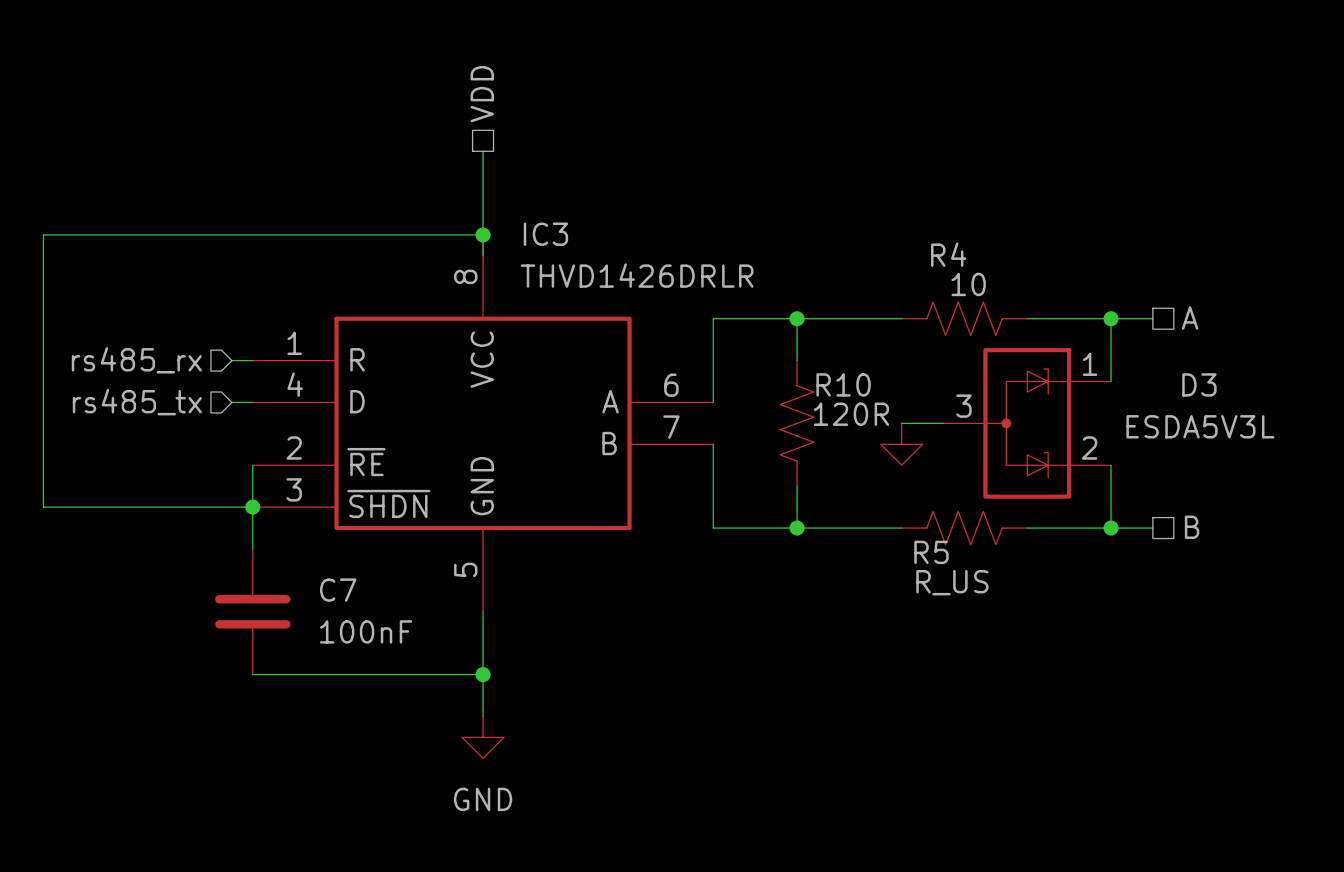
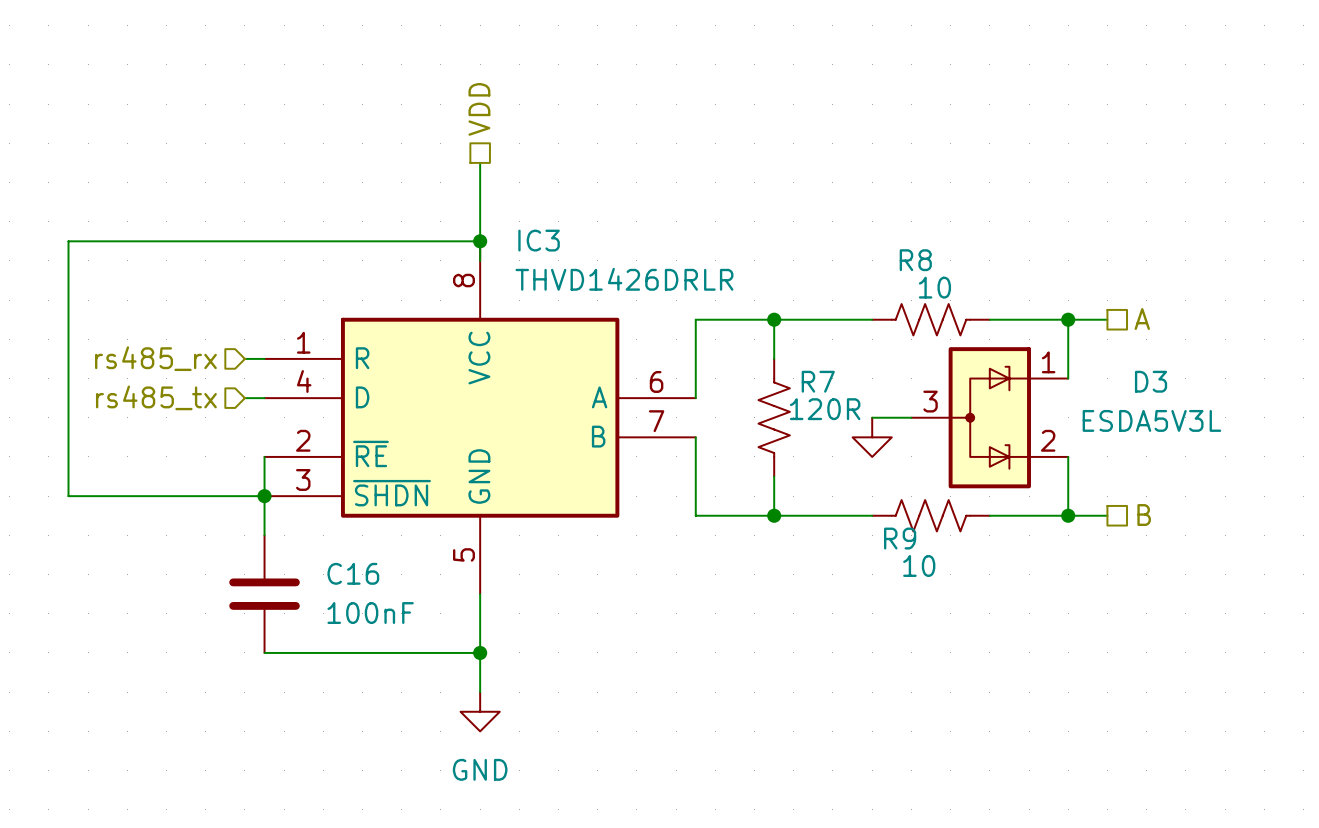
R4 name: R4 (948, 254) -> R8 (915, 260)
R10 name: R10 (843, 384) -> R7 (818, 381)
R5 name: R5 (931, 552) -> R9 (900, 538)
R5 value: R_US (952, 582) -> 10 (919, 565)
C7 name: C7 (338, 590) -> C16 (353, 573)

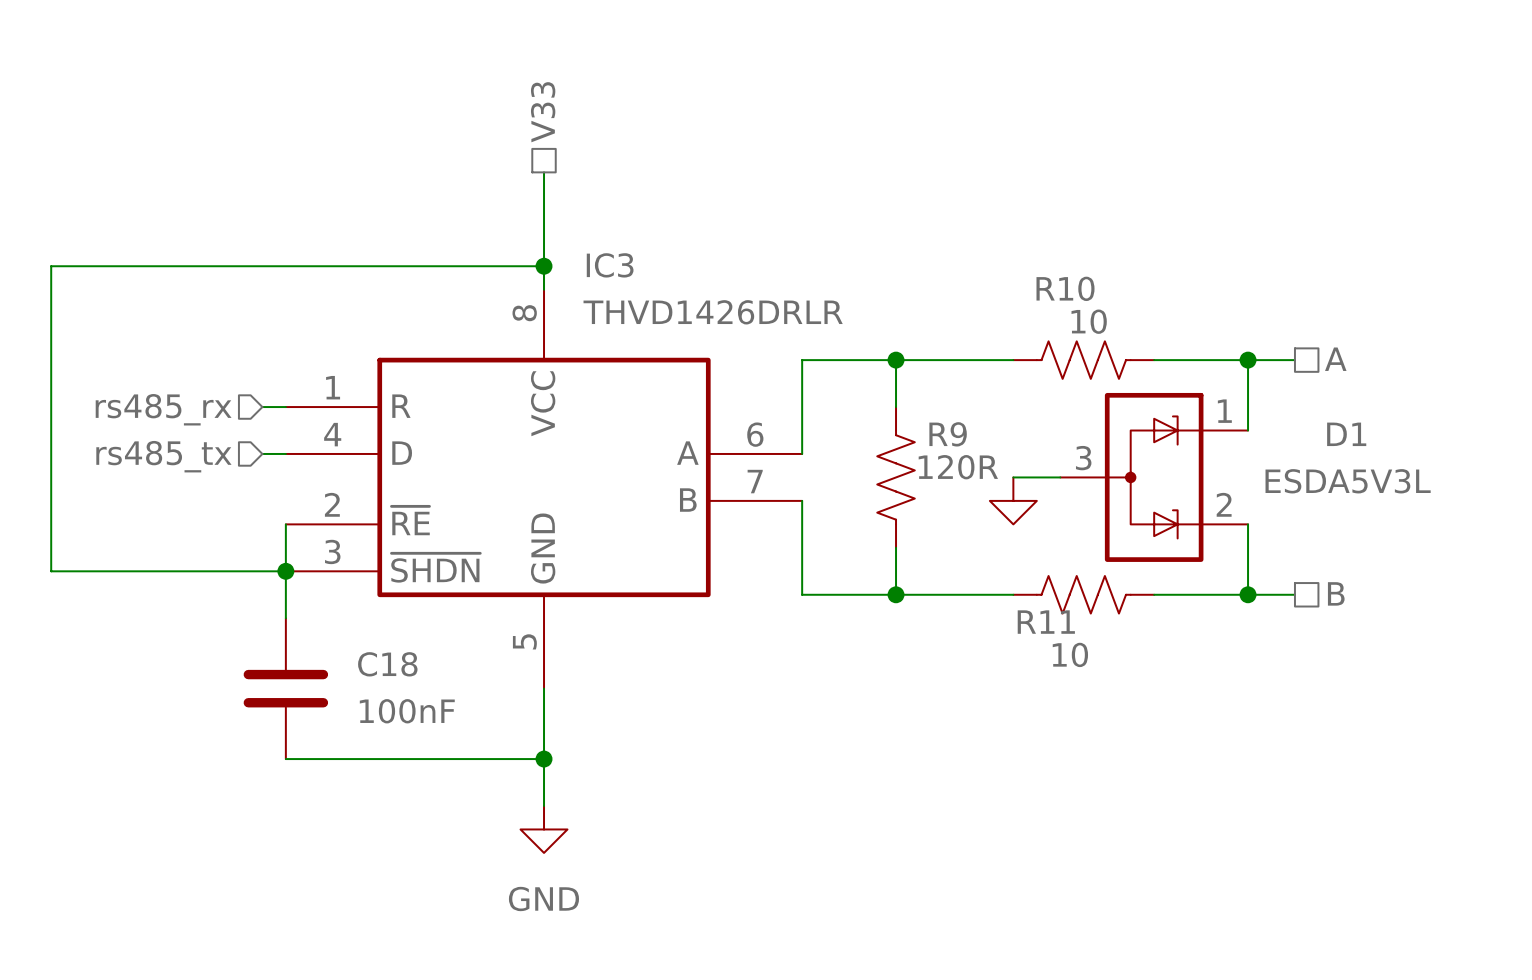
hierarchical label: VDD (479, 109) -> V33 (543, 112)
R8 name: R8 (915, 260) -> R10 (1065, 288)
R7 name: R7 (818, 381) -> R9 (948, 434)
D3 name: D3 (1151, 381) -> D1 (1346, 434)
R9 name: R9 (900, 538) -> R11 (1046, 622)
C16 name: C16 (353, 573) -> C18 (387, 664)

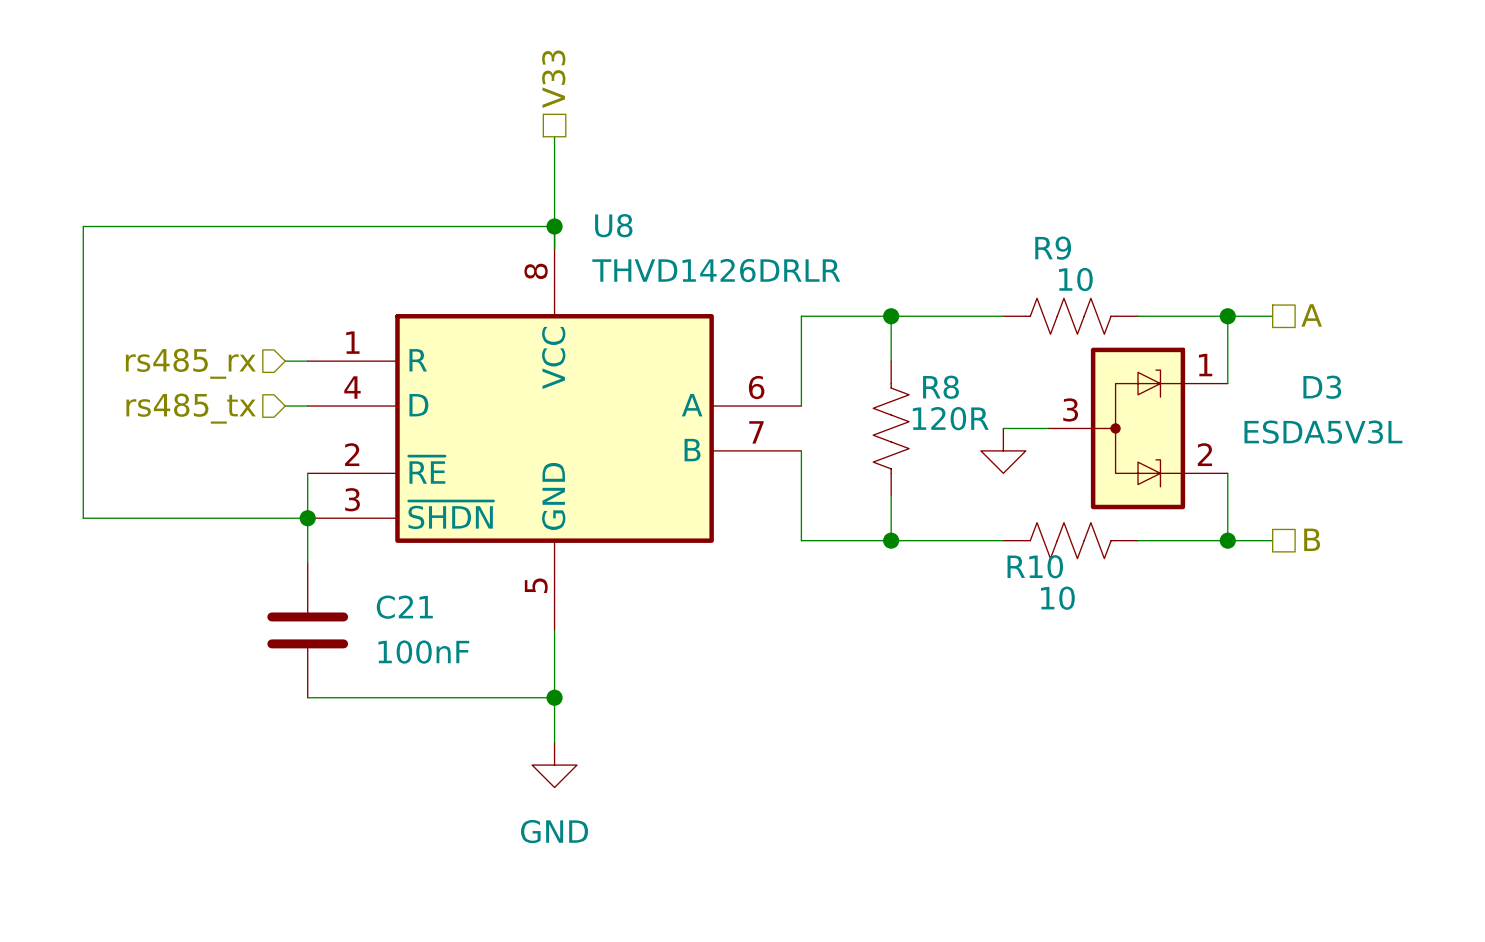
IC3 name: IC3 (610, 265) -> U8 (613, 225)
R10 name: R10 (1065, 288) -> R9 (1053, 248)
R9 name: R9 (948, 434) -> R8 (940, 387)
D1 name: D1 (1346, 434) -> D3 (1322, 387)
R11 name: R11 (1046, 622) -> R10 (1035, 566)
C18 name: C18 (387, 664) -> C21 (404, 607)

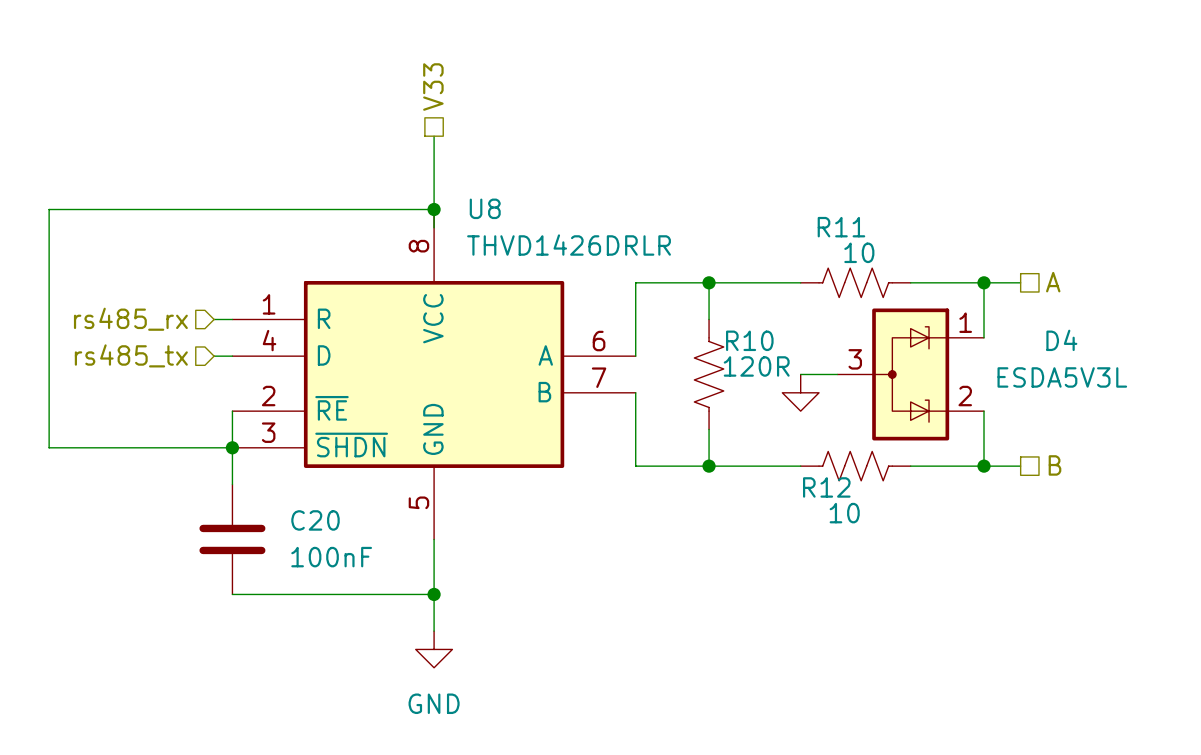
R9 name: R9 (1053, 248) -> R11 (841, 227)
R8 name: R8 (940, 387) -> R10 (749, 340)
D3 name: D3 (1322, 387) -> D4 (1061, 340)
R10 name: R10 (1035, 566) -> R12 (826, 487)
C21 name: C21 (404, 607) -> C20 (315, 520)

